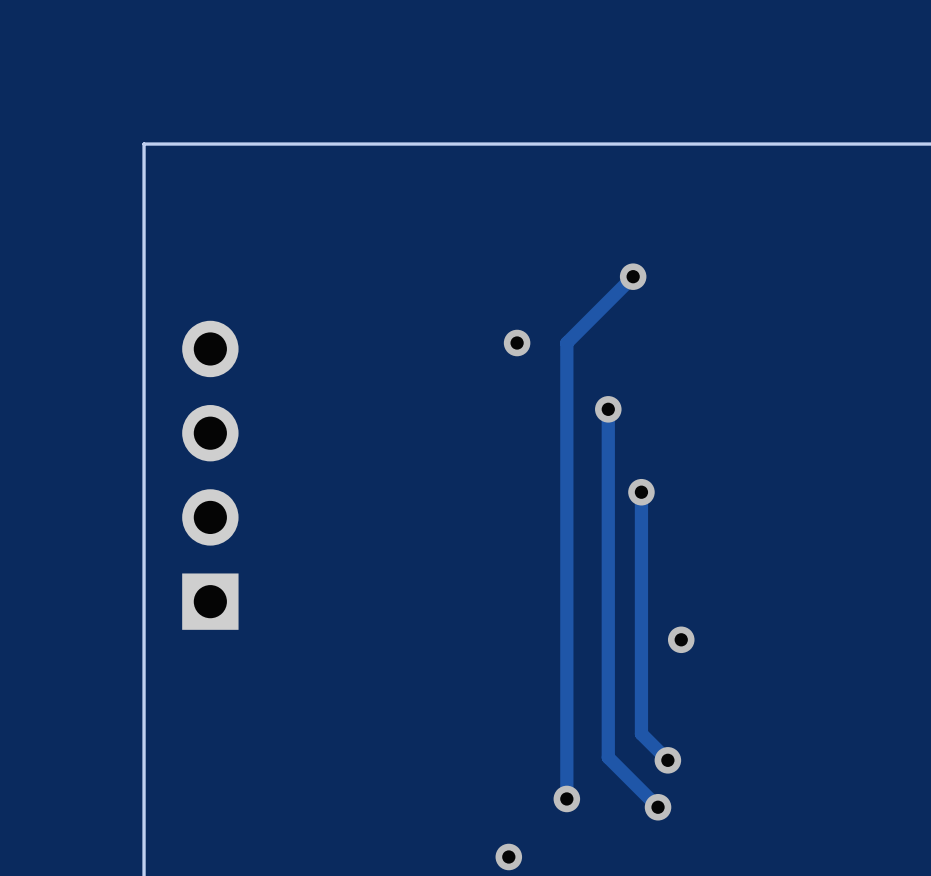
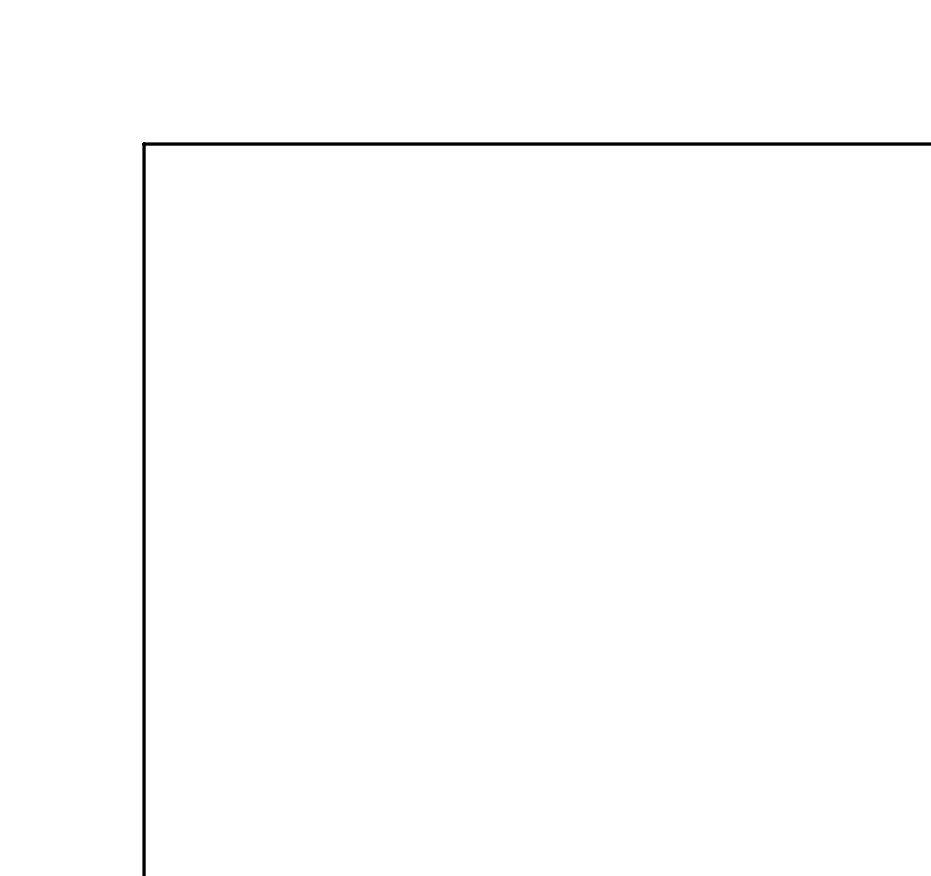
track: (633, 276) (566, 343) (566, 798) -> none
via: (633, 276) -> none
via: (517, 343) -> none
track: (608, 409) (608, 757) (658, 807) -> none
via: (608, 409) -> none
part: (210, 475) -> none
track: (641, 492) (641, 733) (667, 760) -> none
via: (641, 492) -> none
via: (681, 639) -> none
via: (667, 760) -> none
via: (566, 798) -> none
via: (658, 807) -> none
via: (508, 856) -> none

